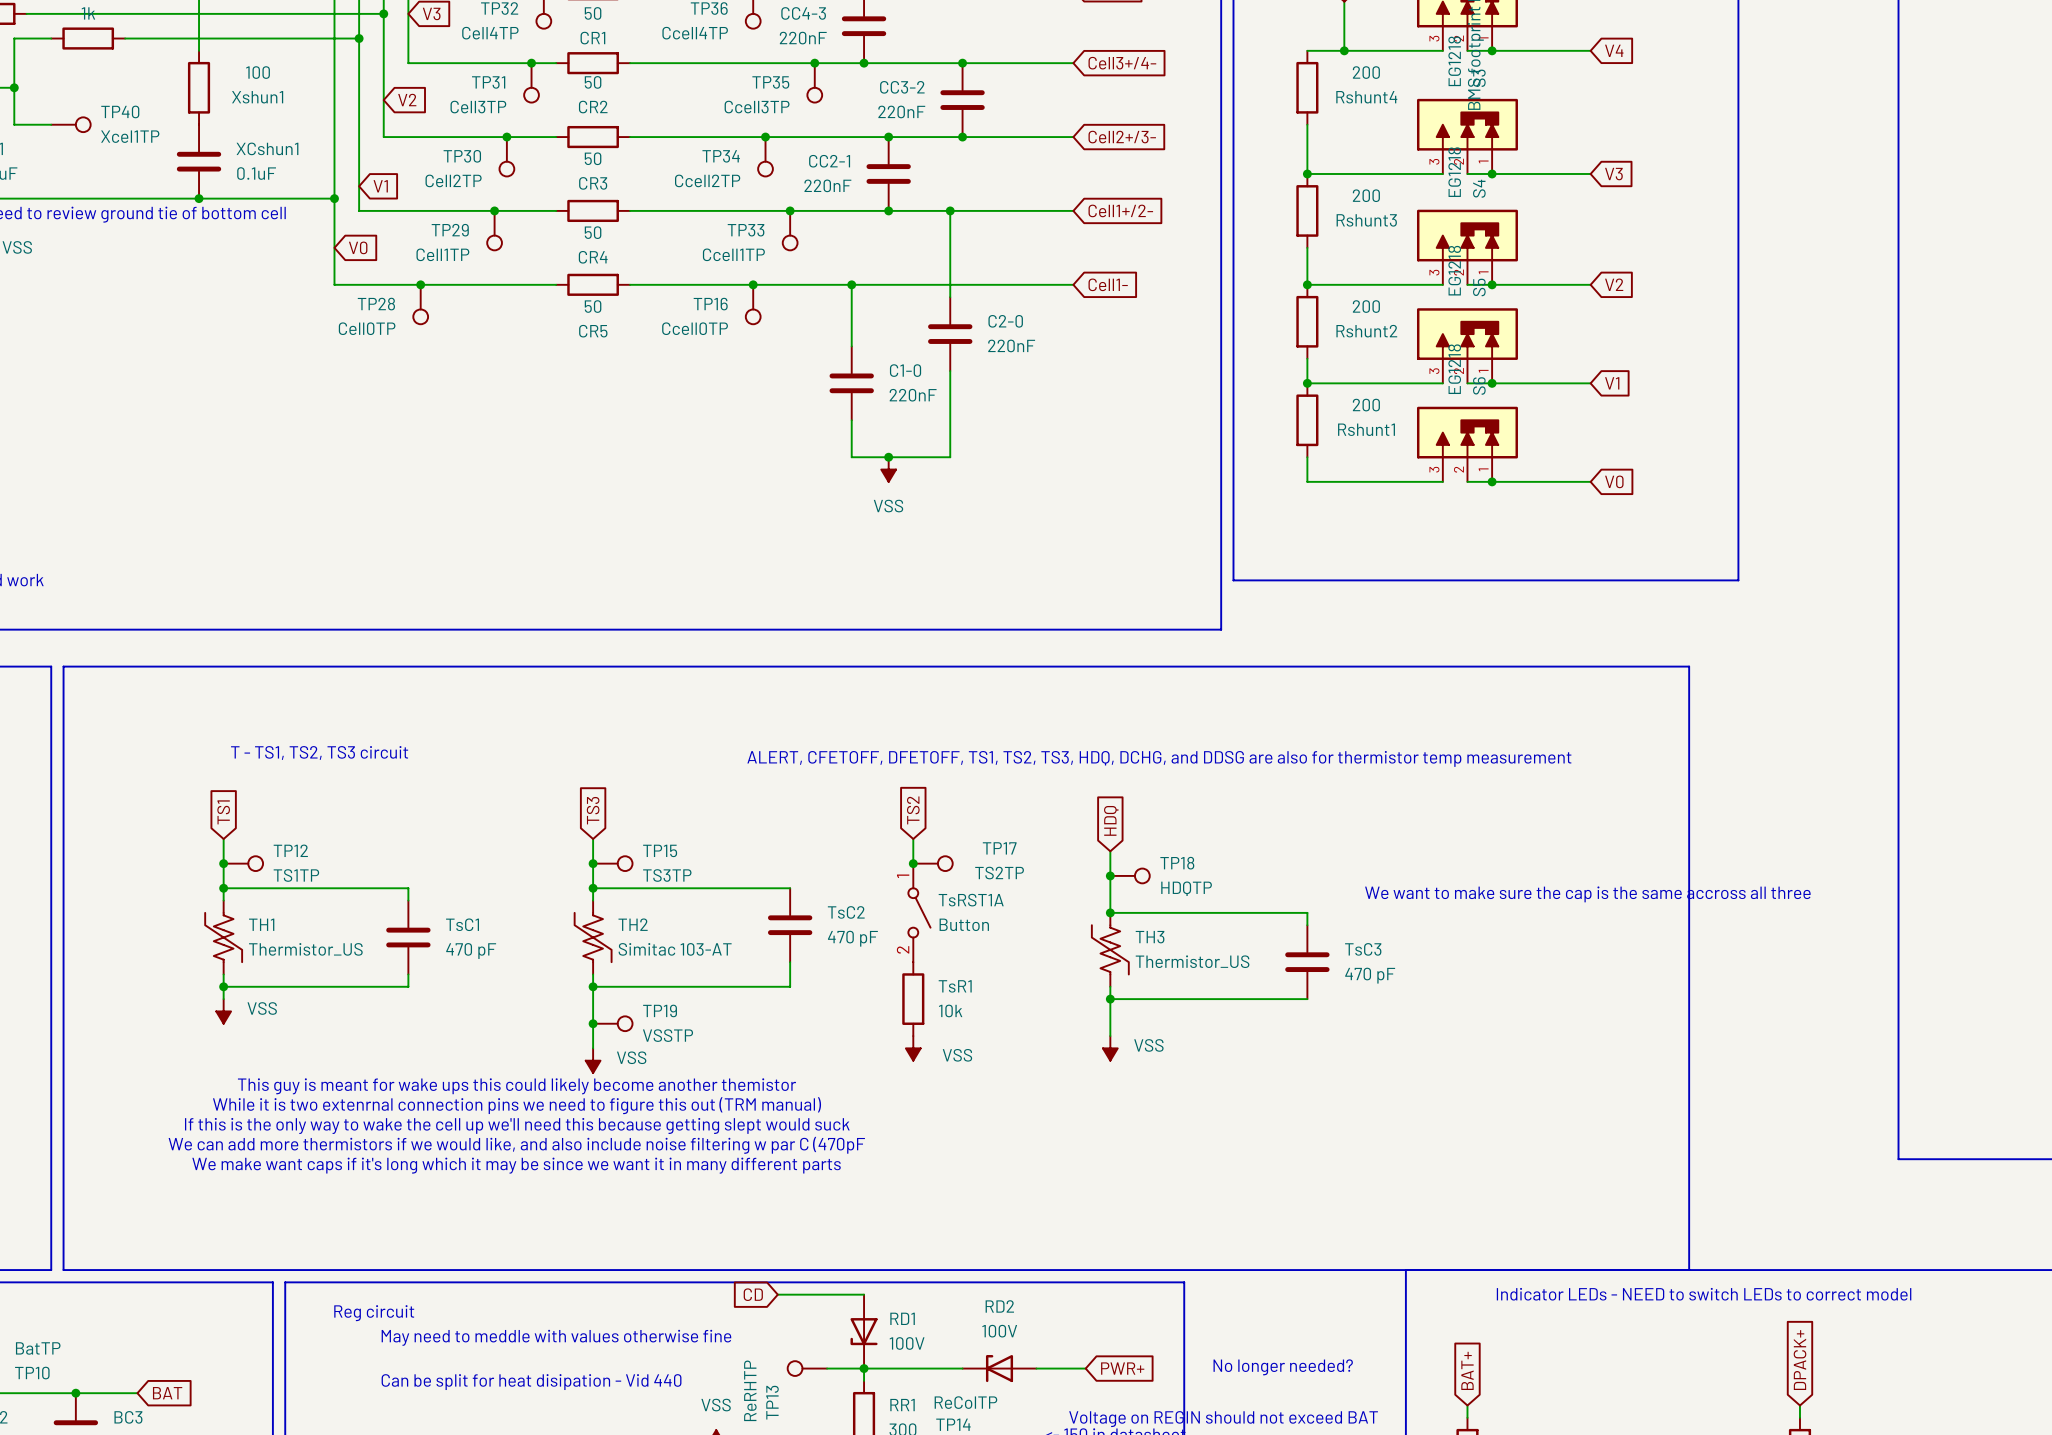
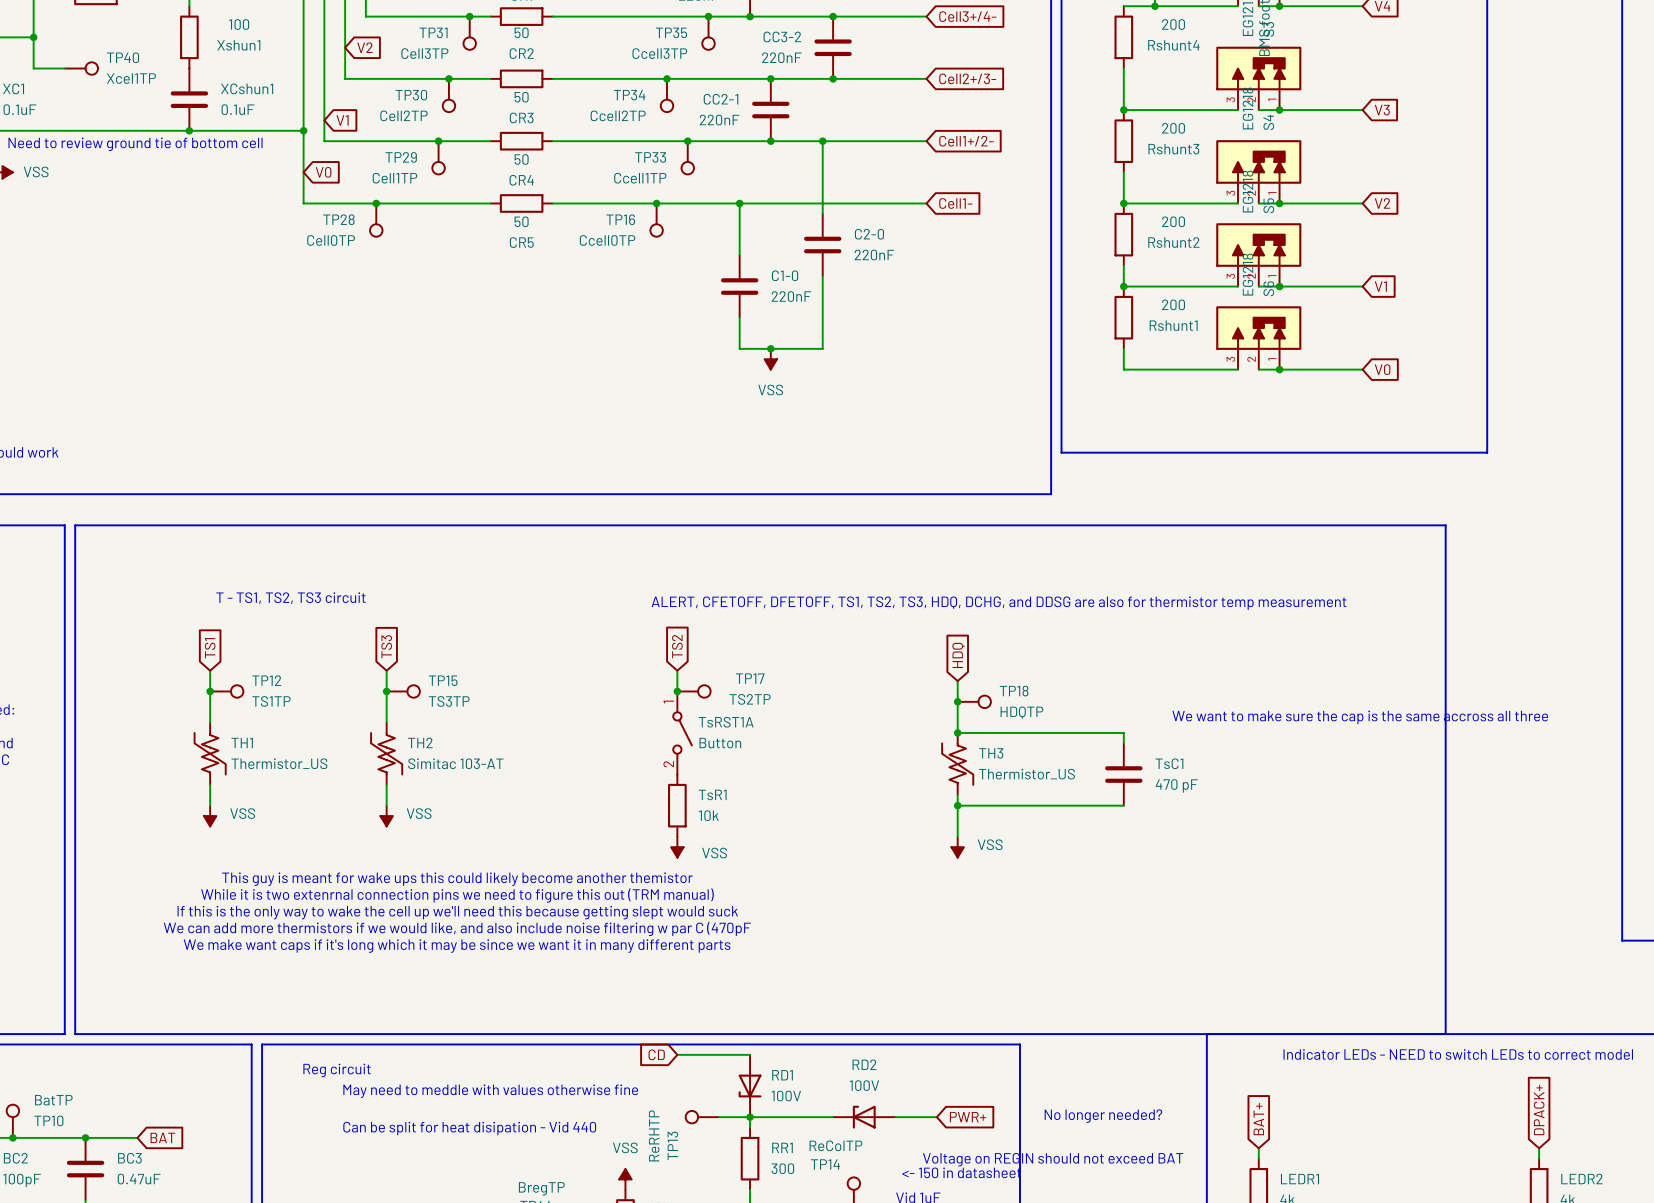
global label position: TS3 (593, 810) -> TS3 (386, 646)
global label position: TS2 (913, 810) -> TS2 (677, 646)
wire: (593, 839) (593, 900) -> (386, 670) (386, 722)
wire: (913, 839) (913, 863) -> (677, 670) (677, 691)
junction: none -> (386, 691)
junction: (593, 863) -> none
TP15 position: (612, 863) -> (403, 691)
junction: none -> (677, 691)
junction: (913, 863) -> none
TP17 position: (933, 863) -> (693, 691)
wire: (223, 888) (408, 888) (408, 900) -> none
junction: (223, 888) -> none
wire: (593, 888) (790, 888) -> none
junction: (593, 888) -> none
TsRST1A position: (919, 912) -> (682, 732)
TsC2: 470 pF (790, 925) -> none
TsC1: 470 pF (408, 937) -> none
TH2 position: (593, 937) -> (386, 753)
TsC3 name: TsC3 (1363, 949) -> TsC1 (1169, 763)
wire: (790, 962) (790, 986) (593, 986) -> none
wire: (408, 974) (408, 986) (223, 986) -> none
wire: none -> (386, 784) (386, 805)
wire: (593, 974) (593, 1048) -> none
junction: (223, 986) -> none
junction: (593, 986) -> none
TsR1 position: (913, 999) -> (677, 805)
power symbol: none -> VSS (386, 816)
junction: (593, 1023) -> none
TP19: VSSTP (612, 1023) -> none
power symbol: none -> VSS (677, 847)
power symbol: VSS (913, 1048) -> none
power symbol: VSS (593, 1060) -> none

